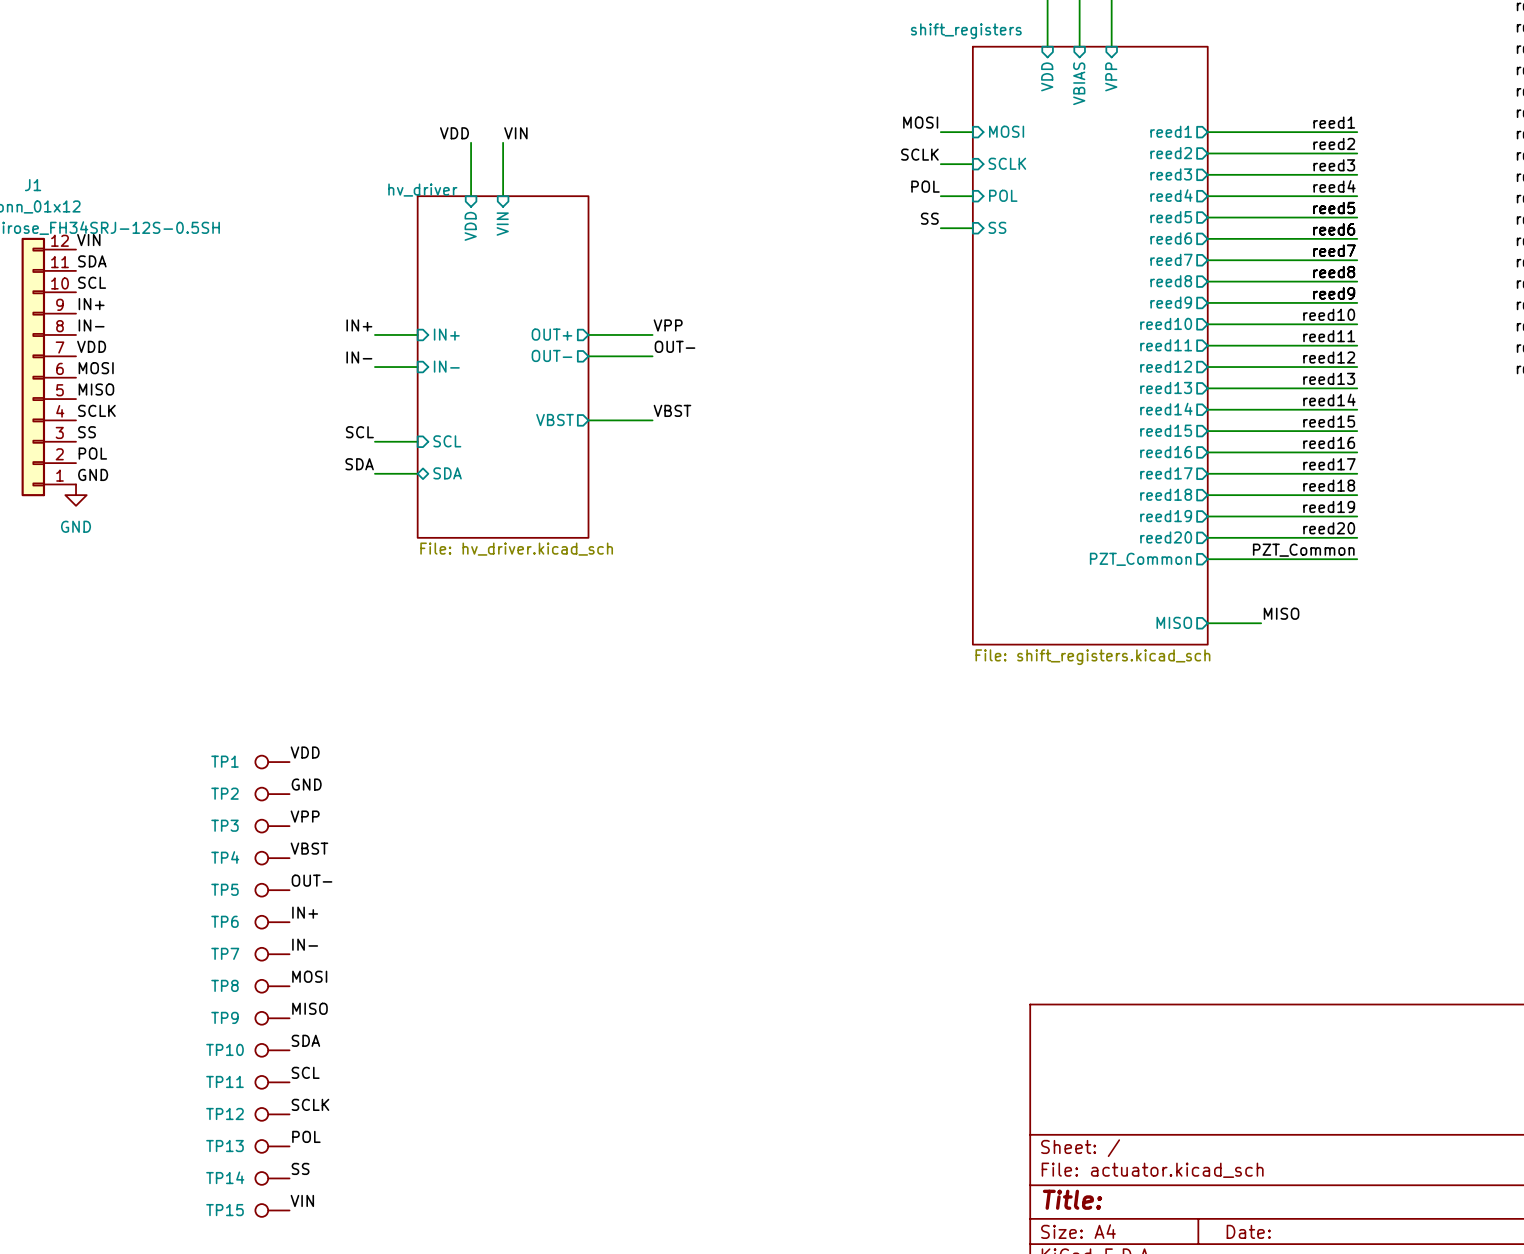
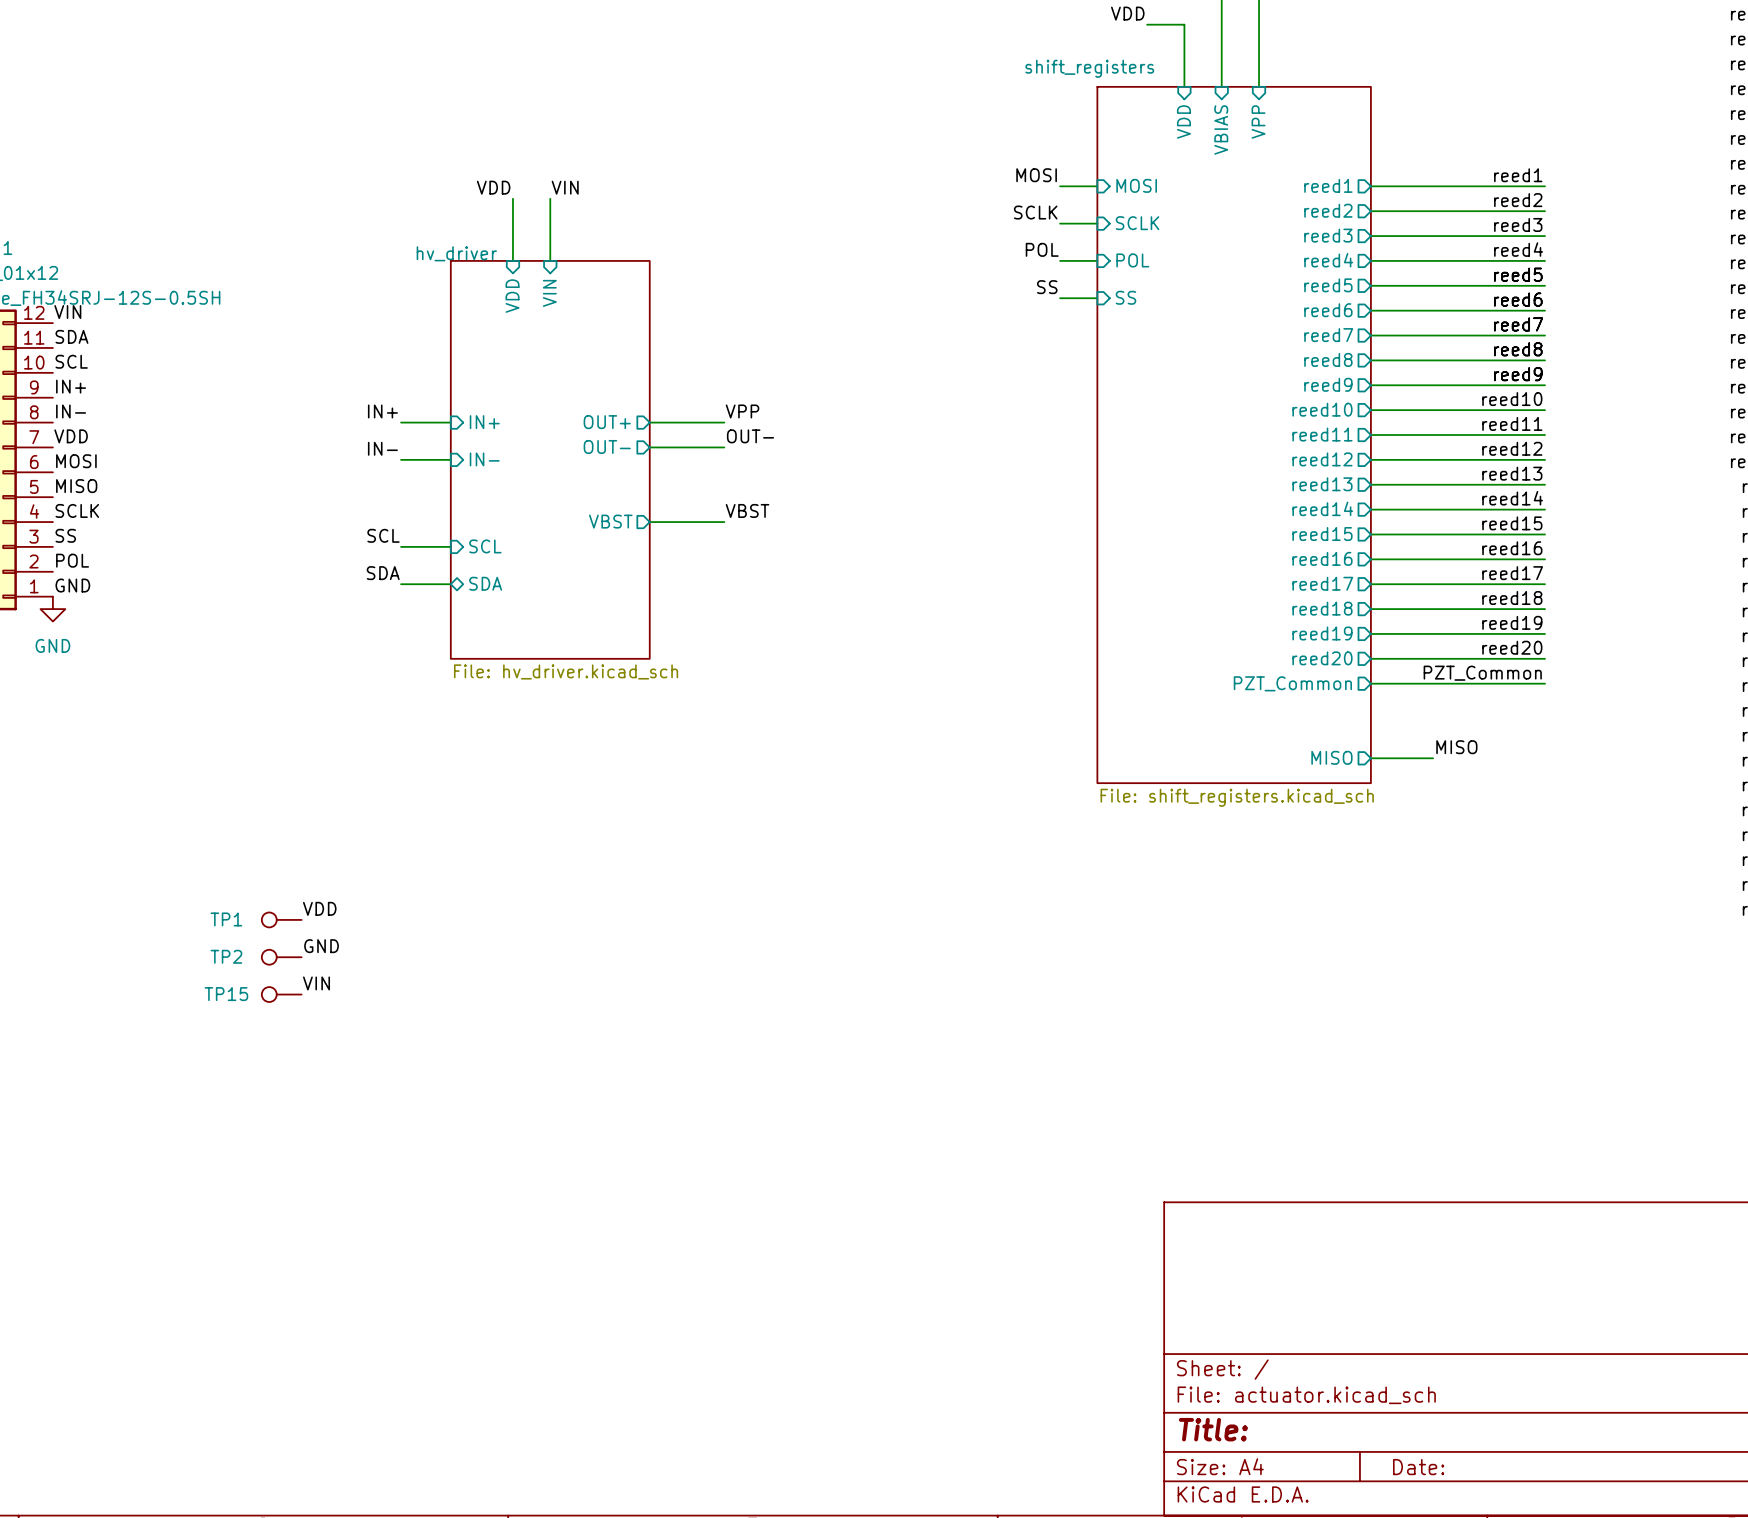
label: VPP (305, 816) -> VIN (316, 983)
TP3 name: TP3 (224, 825) -> TP15 (226, 994)
label: VBST (309, 848) -> none
TP4: (272, 858) -> none
label: OUT- (312, 880) -> none
TP5: (272, 890) -> none
label: IN+ (305, 912) -> none
TP6: (272, 922) -> none
label: IN- (305, 944) -> none
TP7: (272, 954) -> none
label: MOSI (309, 976) -> none
TP8: (272, 986) -> none
label: MISO (309, 1008) -> none
TP9: (272, 1018) -> none
label: SDA (305, 1040) -> none
TP10: (272, 1050) -> none
label: SCL (305, 1072) -> none
TP11: (272, 1082) -> none
label: SCLK (310, 1104) -> none
TP12: (272, 1114) -> none
label: POL (306, 1136) -> none
TP13: (272, 1146) -> none
label: SS (300, 1168) -> none
TP14: (272, 1178) -> none
label: VIN (302, 1200) -> none
TP15: (272, 1210) -> none

